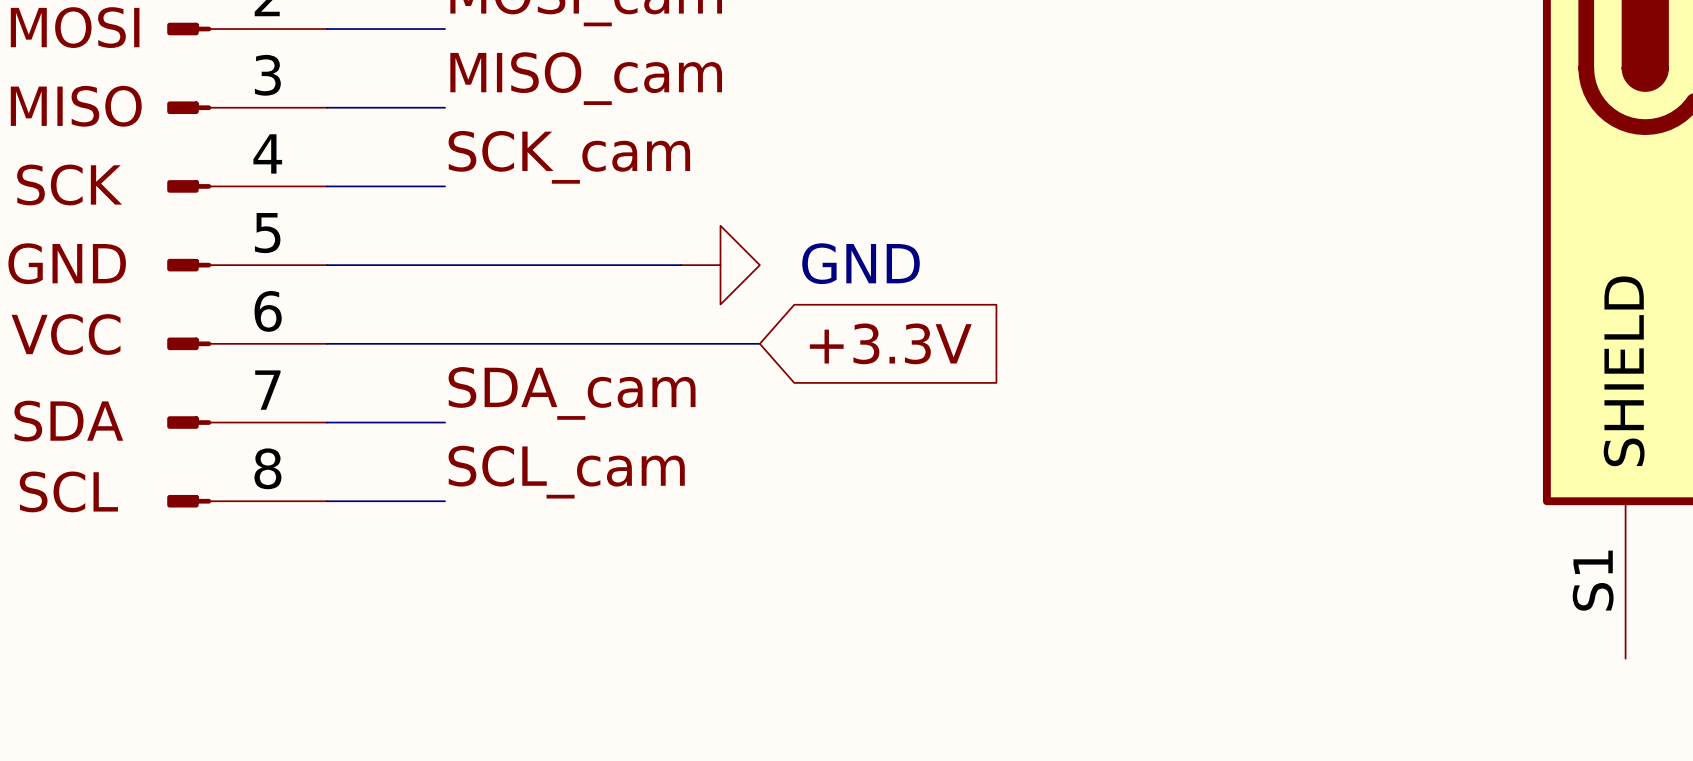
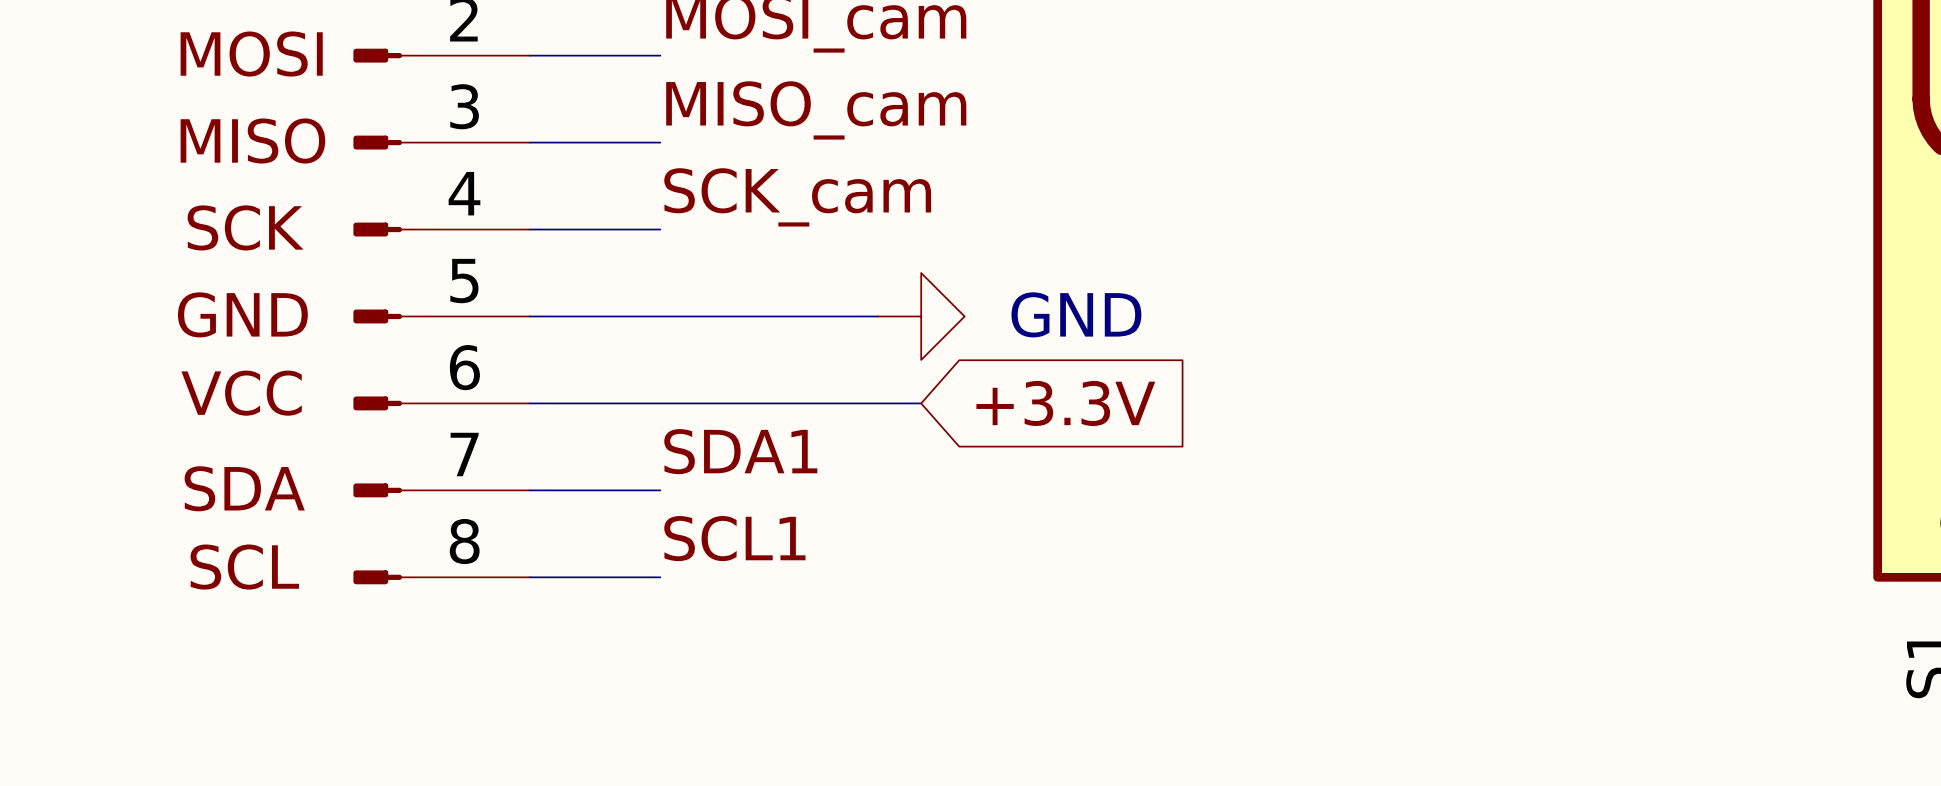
power symbol position: GND (720, 265) -> GND (921, 316)
wire: (681, 343) (759, 343) -> none
global label position: +3.3V (890, 343) -> +3.3V (1065, 403)
label: SDA_cam (572, 393) -> SDA1 (740, 451)
label: SCL_cam (566, 472) -> SCL1 (734, 538)

